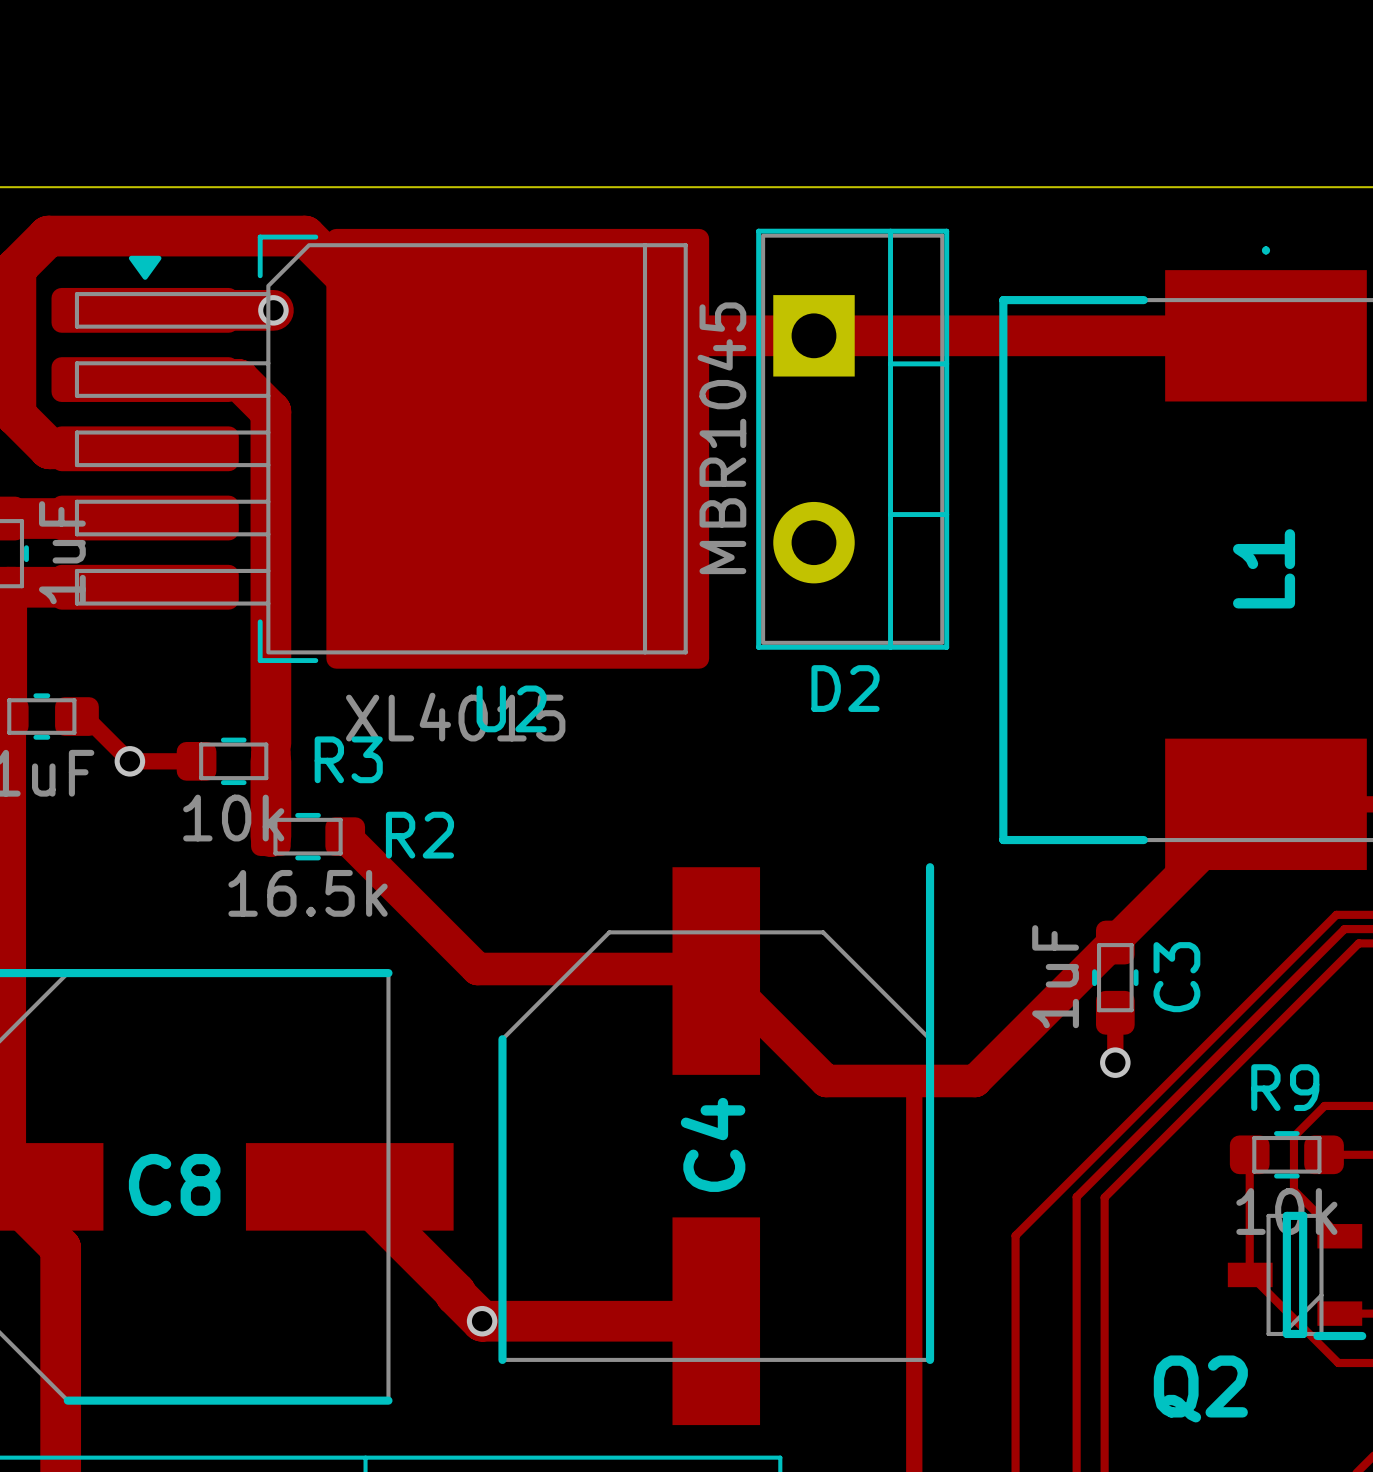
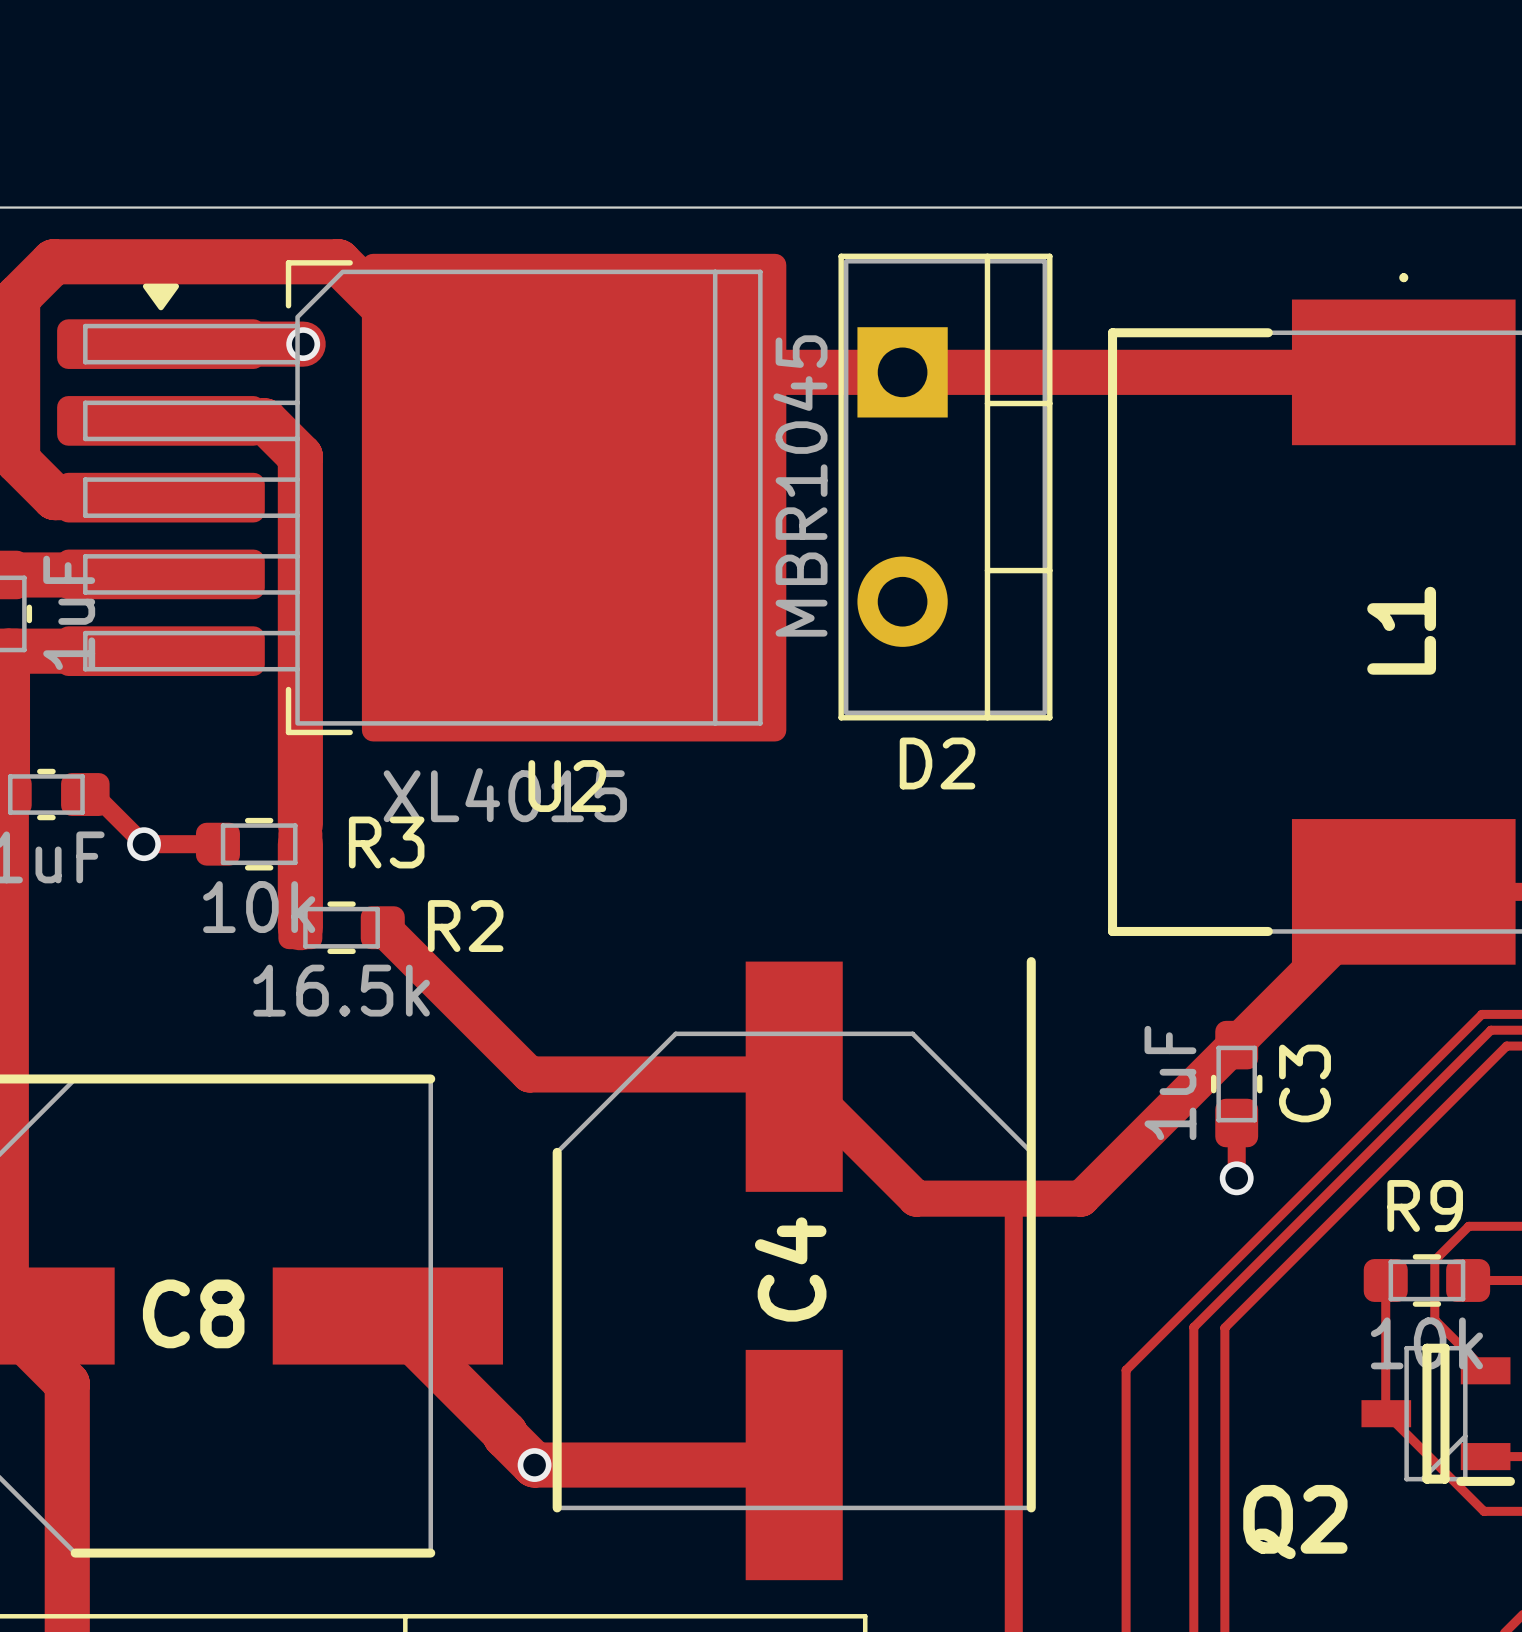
Q2 name position: Q2 (1200, 1388) -> Q2 (1295, 1522)

